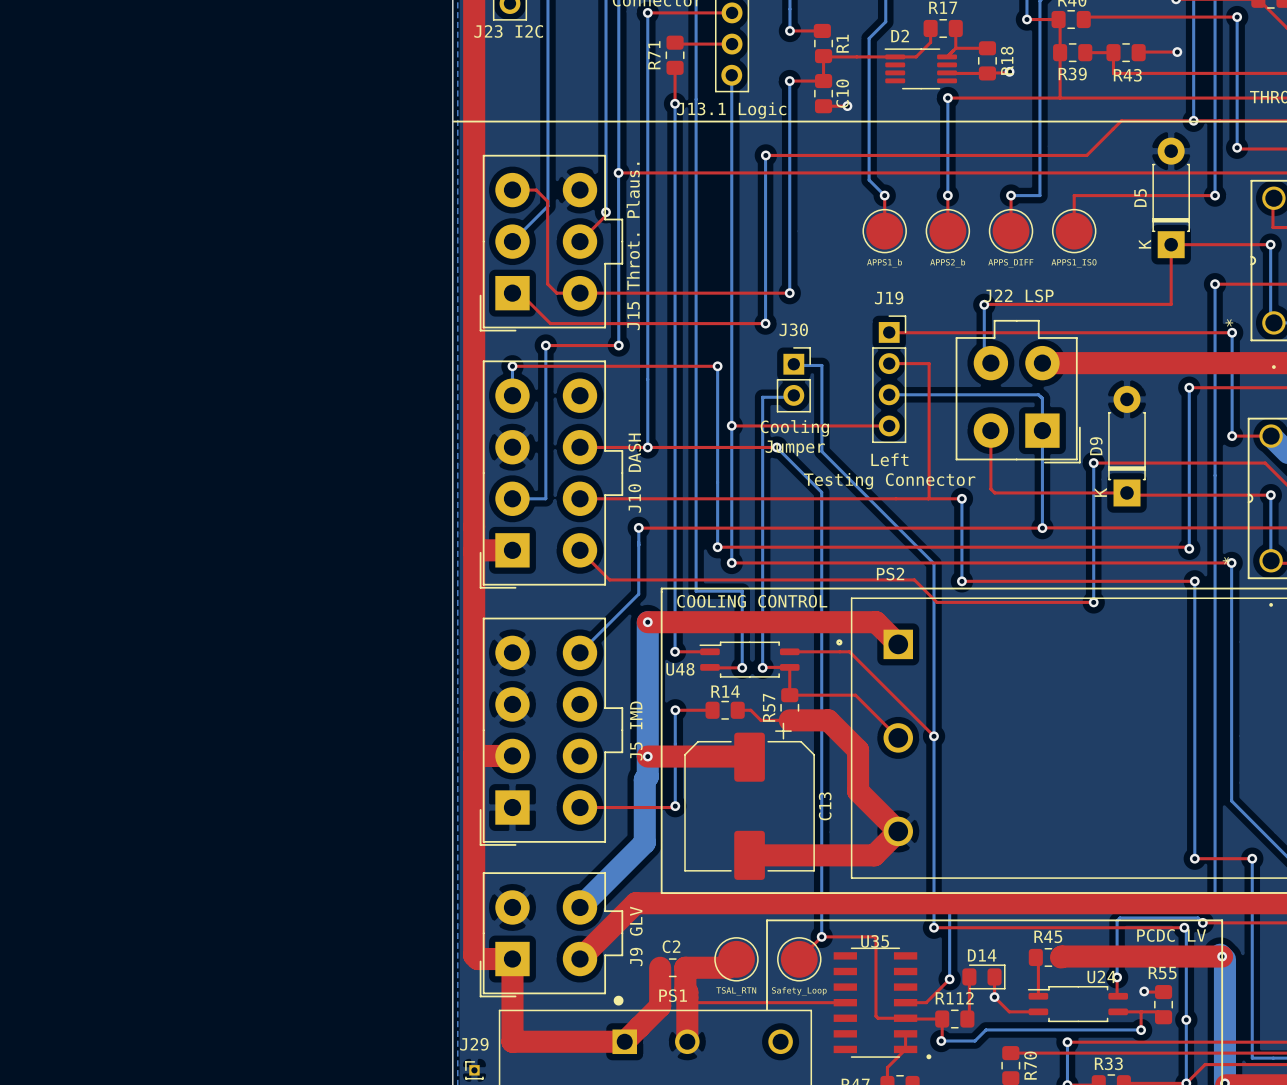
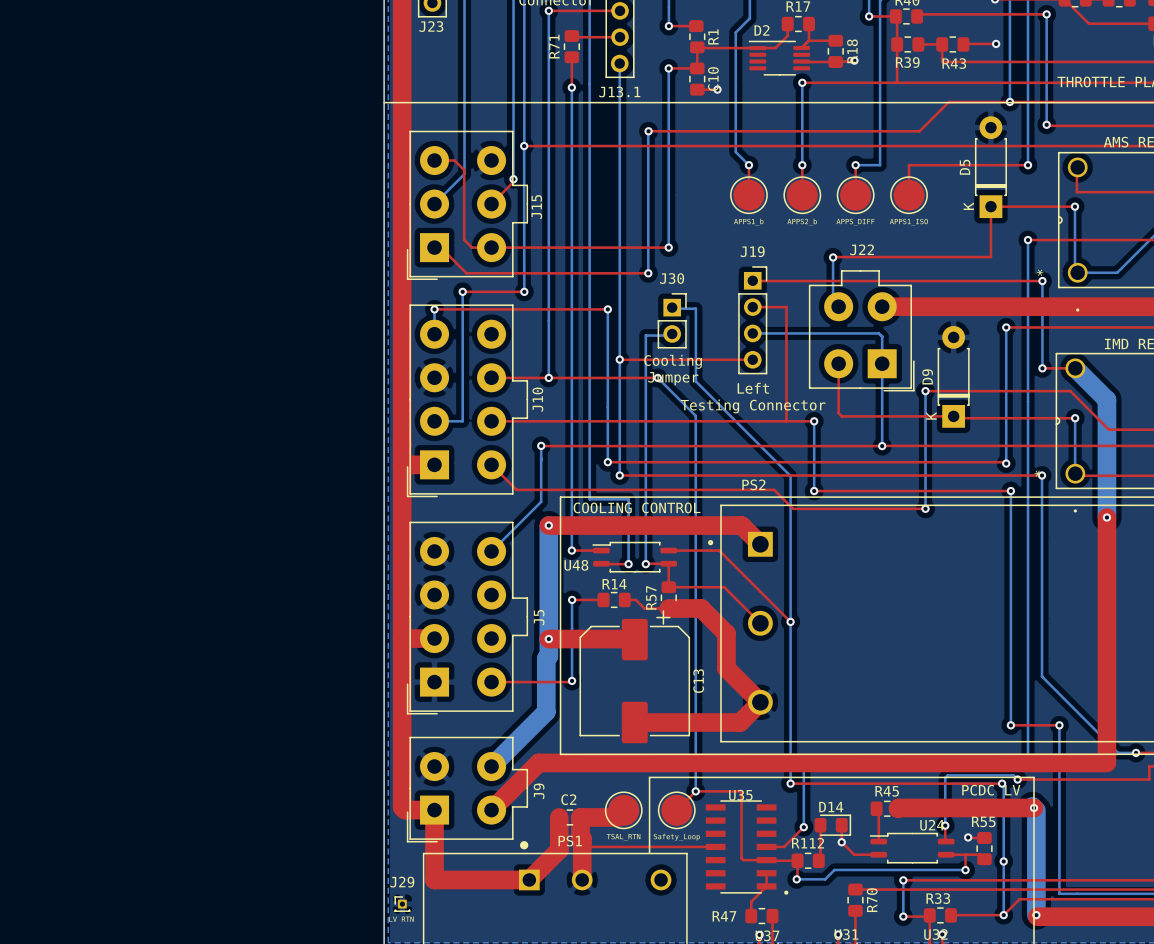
J23 I2C name: J23 I2C (508, 31) -> J23 (431, 26)
J13.1 Logic name: J13.1 Logic (731, 110) -> J13.1 (619, 91)
J15 Throt. Plaus. name: J15 Throt. Plaus. (633, 246) -> J15 (536, 206)
J22 LSP name: J22 LSP (1018, 295) -> J22 (862, 249)
J10 DASH name: J10 DASH (634, 473) -> J10 (537, 399)
J5 IMD name: J5 IMD (636, 730) -> J5 (539, 617)
J9 GLV name: J9 GLV (636, 936) -> J9 (539, 791)

